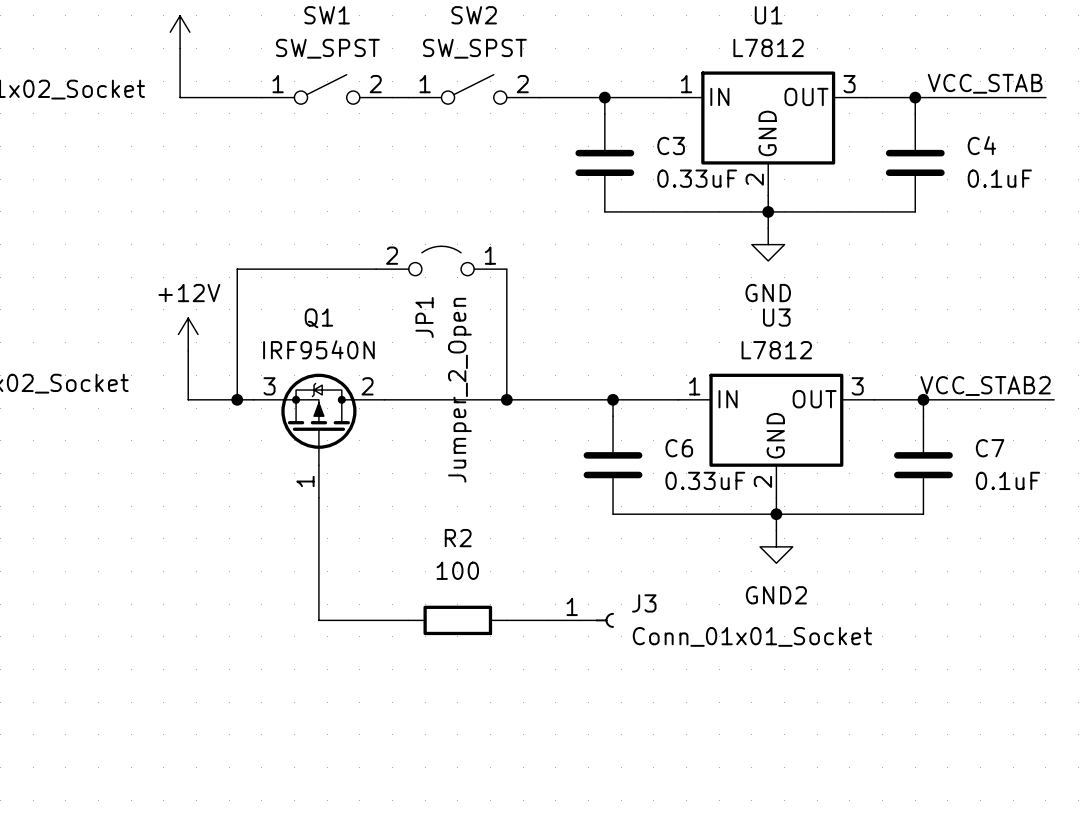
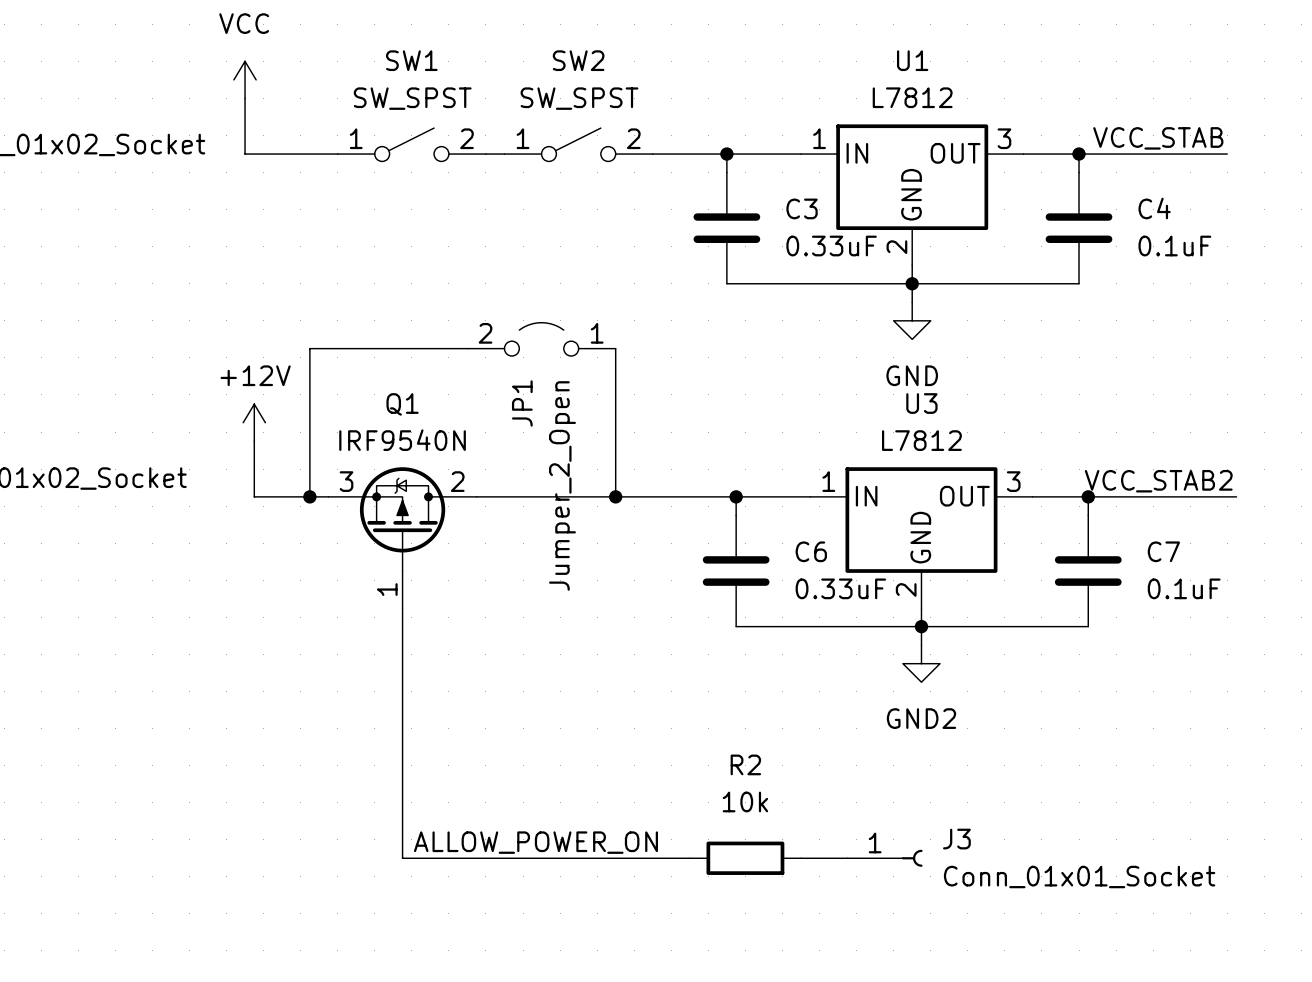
R2 value: 100 (457, 570) -> 10k (745, 801)
wire: (318, 620) (408, 620) -> (402, 747) (402, 858) (689, 858)
R2 position: (457, 620) -> (745, 858)
wire: (506, 620) (547, 620) -> (801, 858) (847, 858)
J3 position: (580, 620) -> (884, 858)
label: none -> ALLOW_POWER_ON (535, 842)

